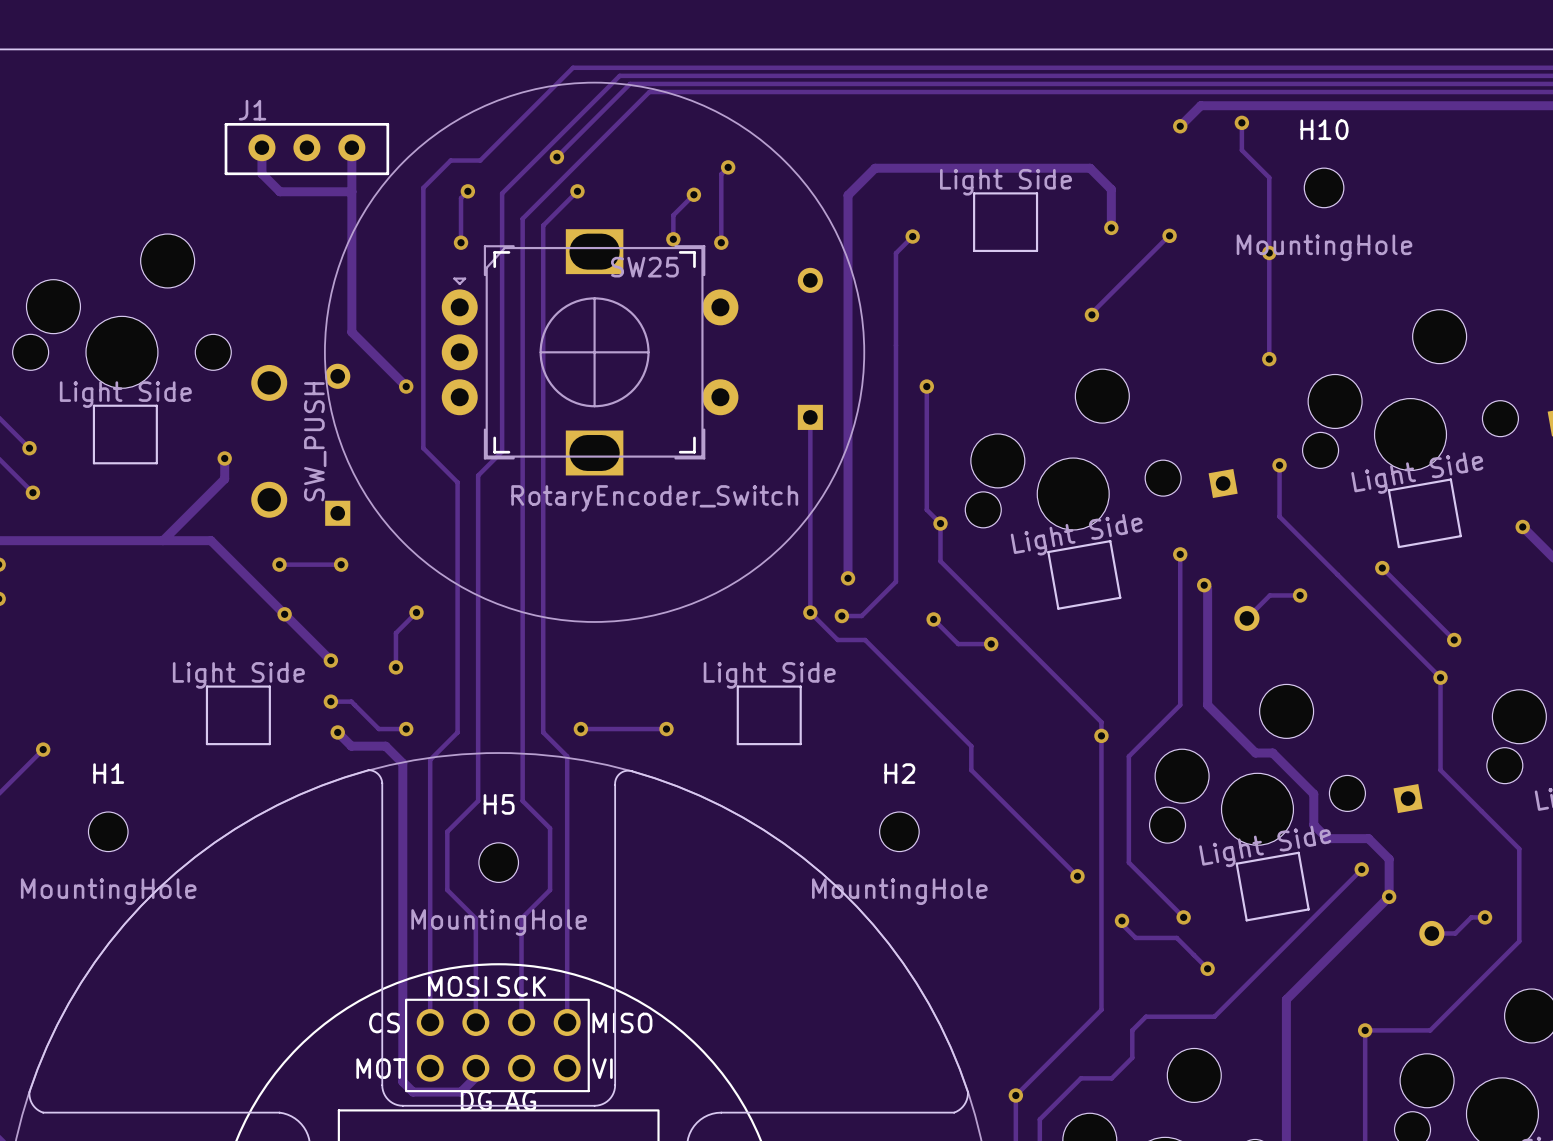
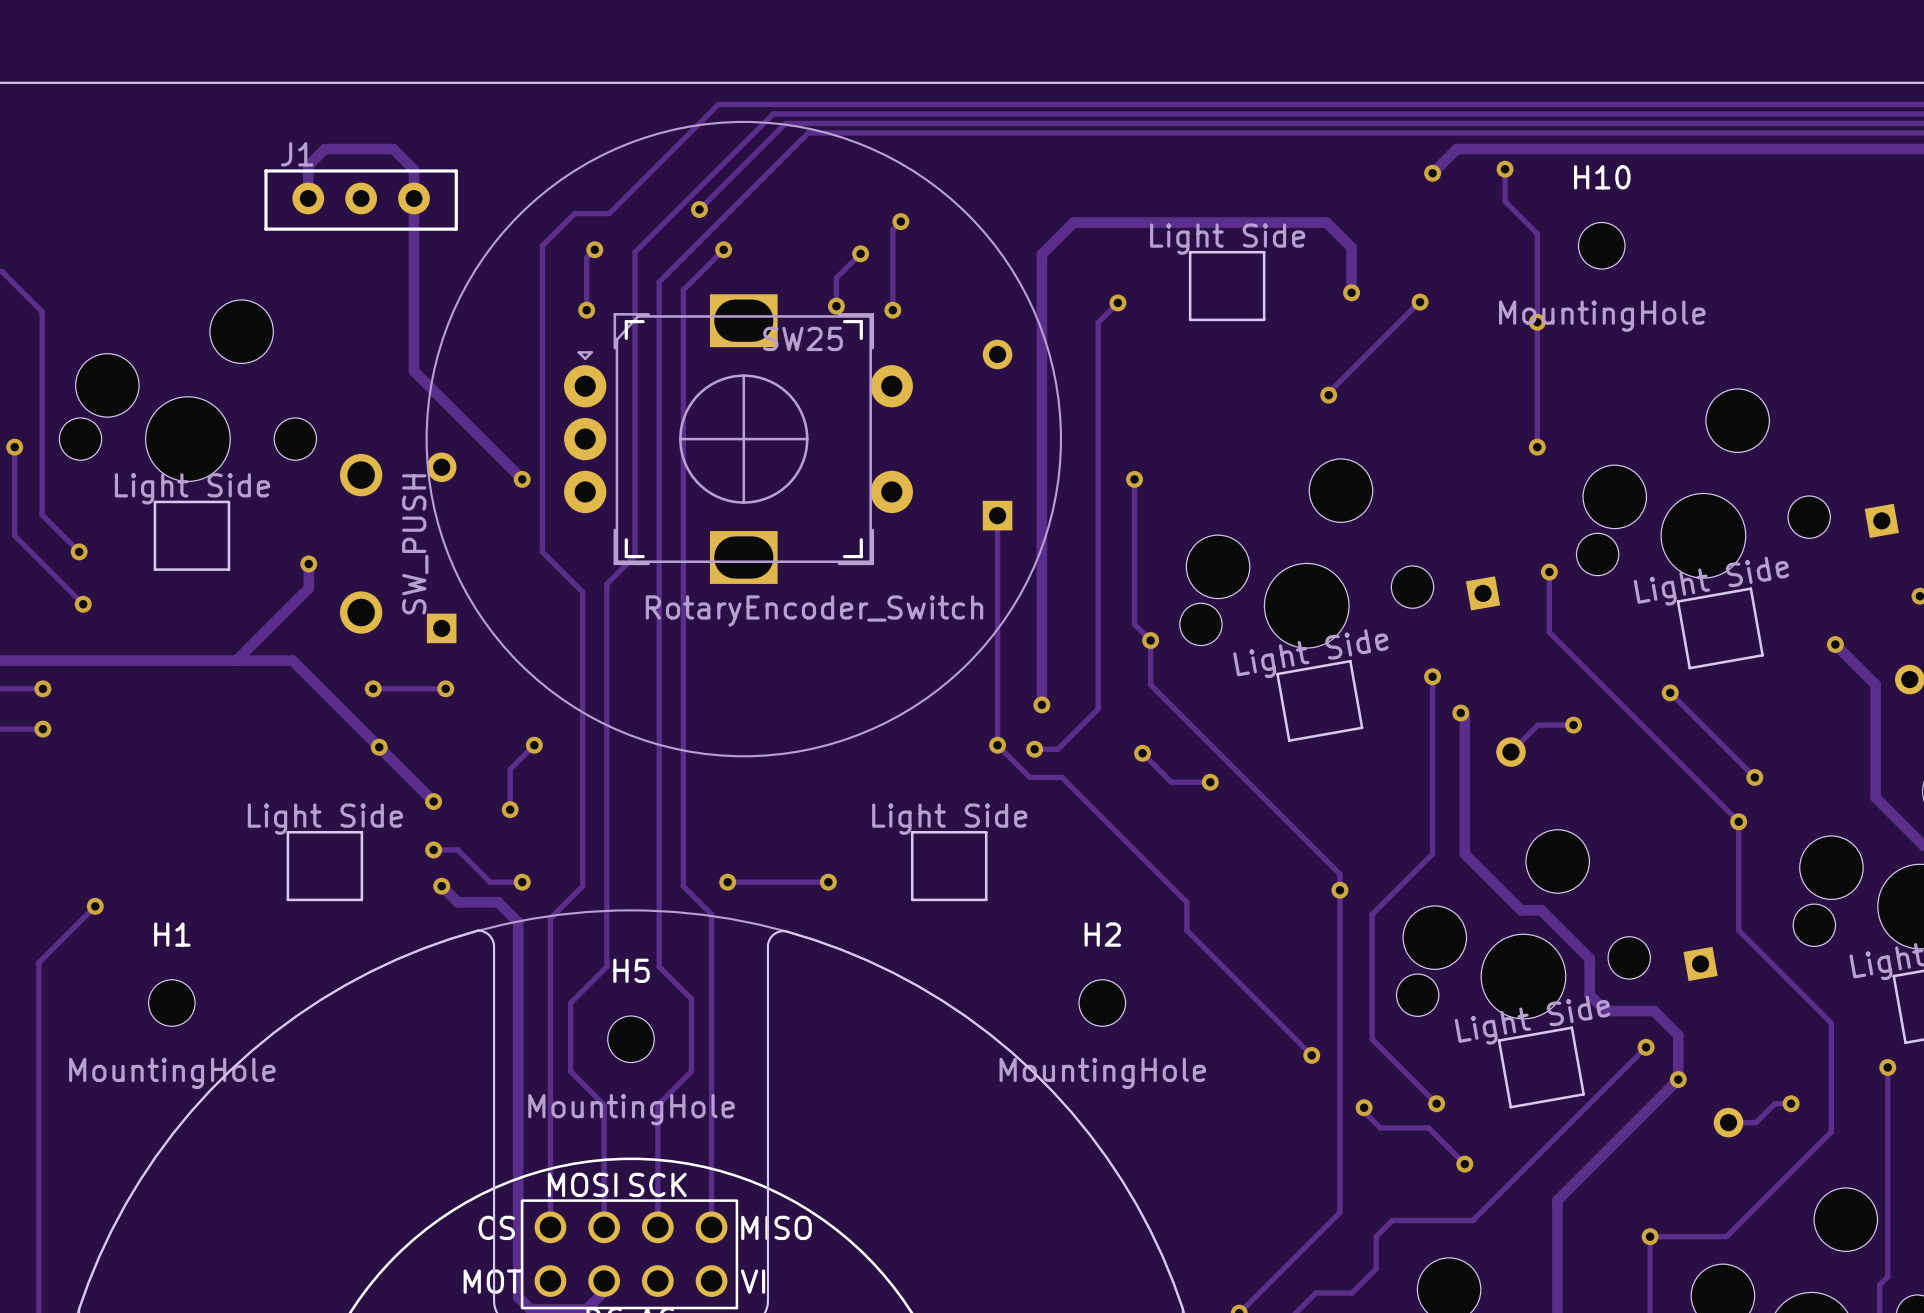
track: (261, 147) (261, 173) (279, 191) (351, 191) -> none
track: (351, 147) (351, 332) -> (308, 198) (308, 165) (324, 149) (393, 149) (413, 169) (413, 371) (458, 415)
J1 position: (306, 149) -> (361, 200)

